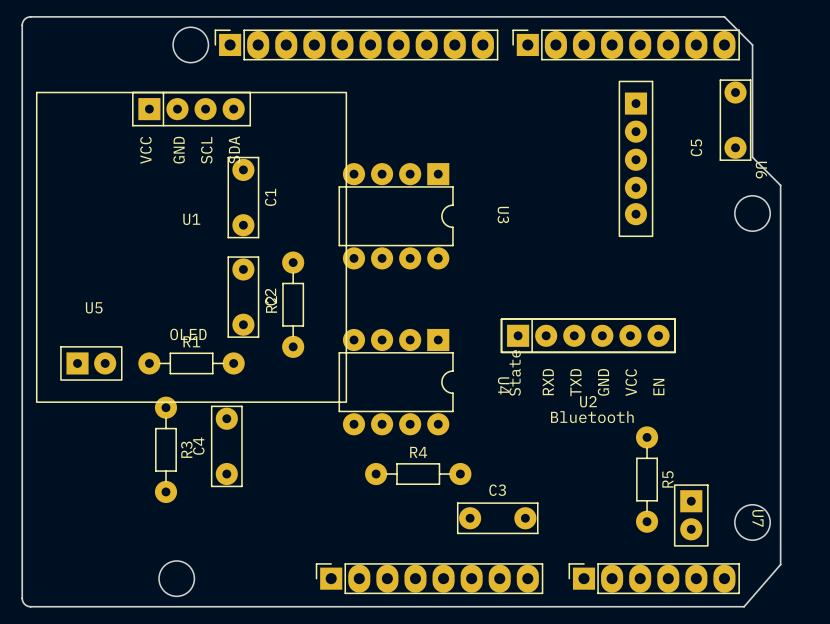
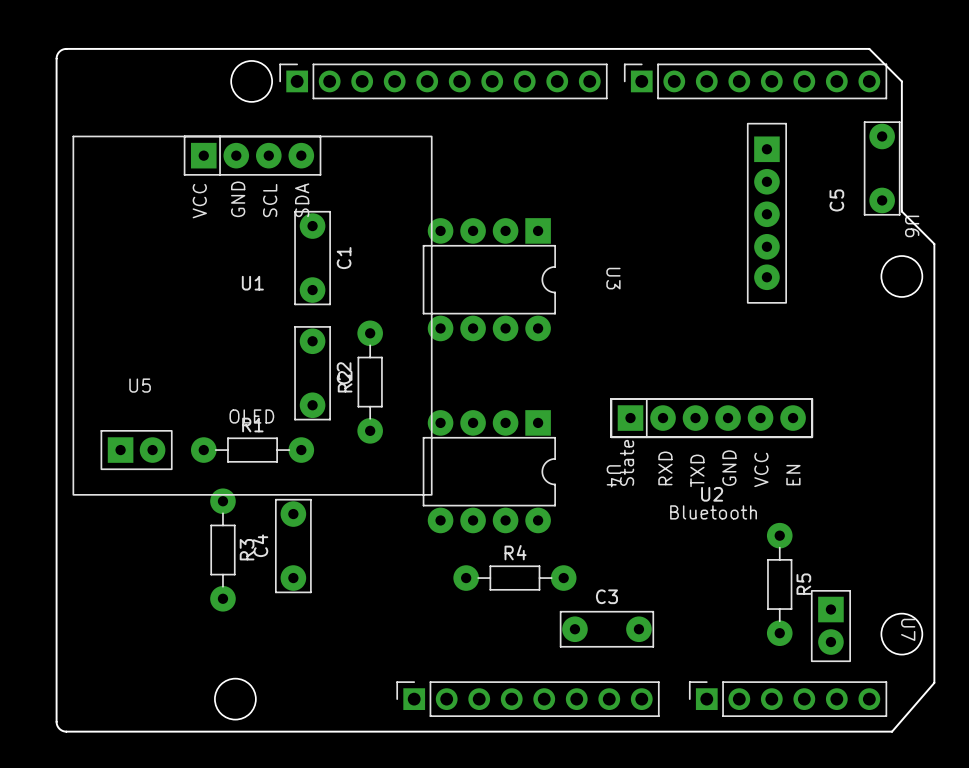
part footprint: [214, 29, 499, 61] -> [279, 63, 608, 100]
part footprint: [512, 29, 740, 61] -> [623, 63, 888, 100]
part footprint: [315, 563, 544, 595] -> [396, 681, 660, 717]
part footprint: [568, 563, 740, 595] -> [689, 681, 888, 717]

